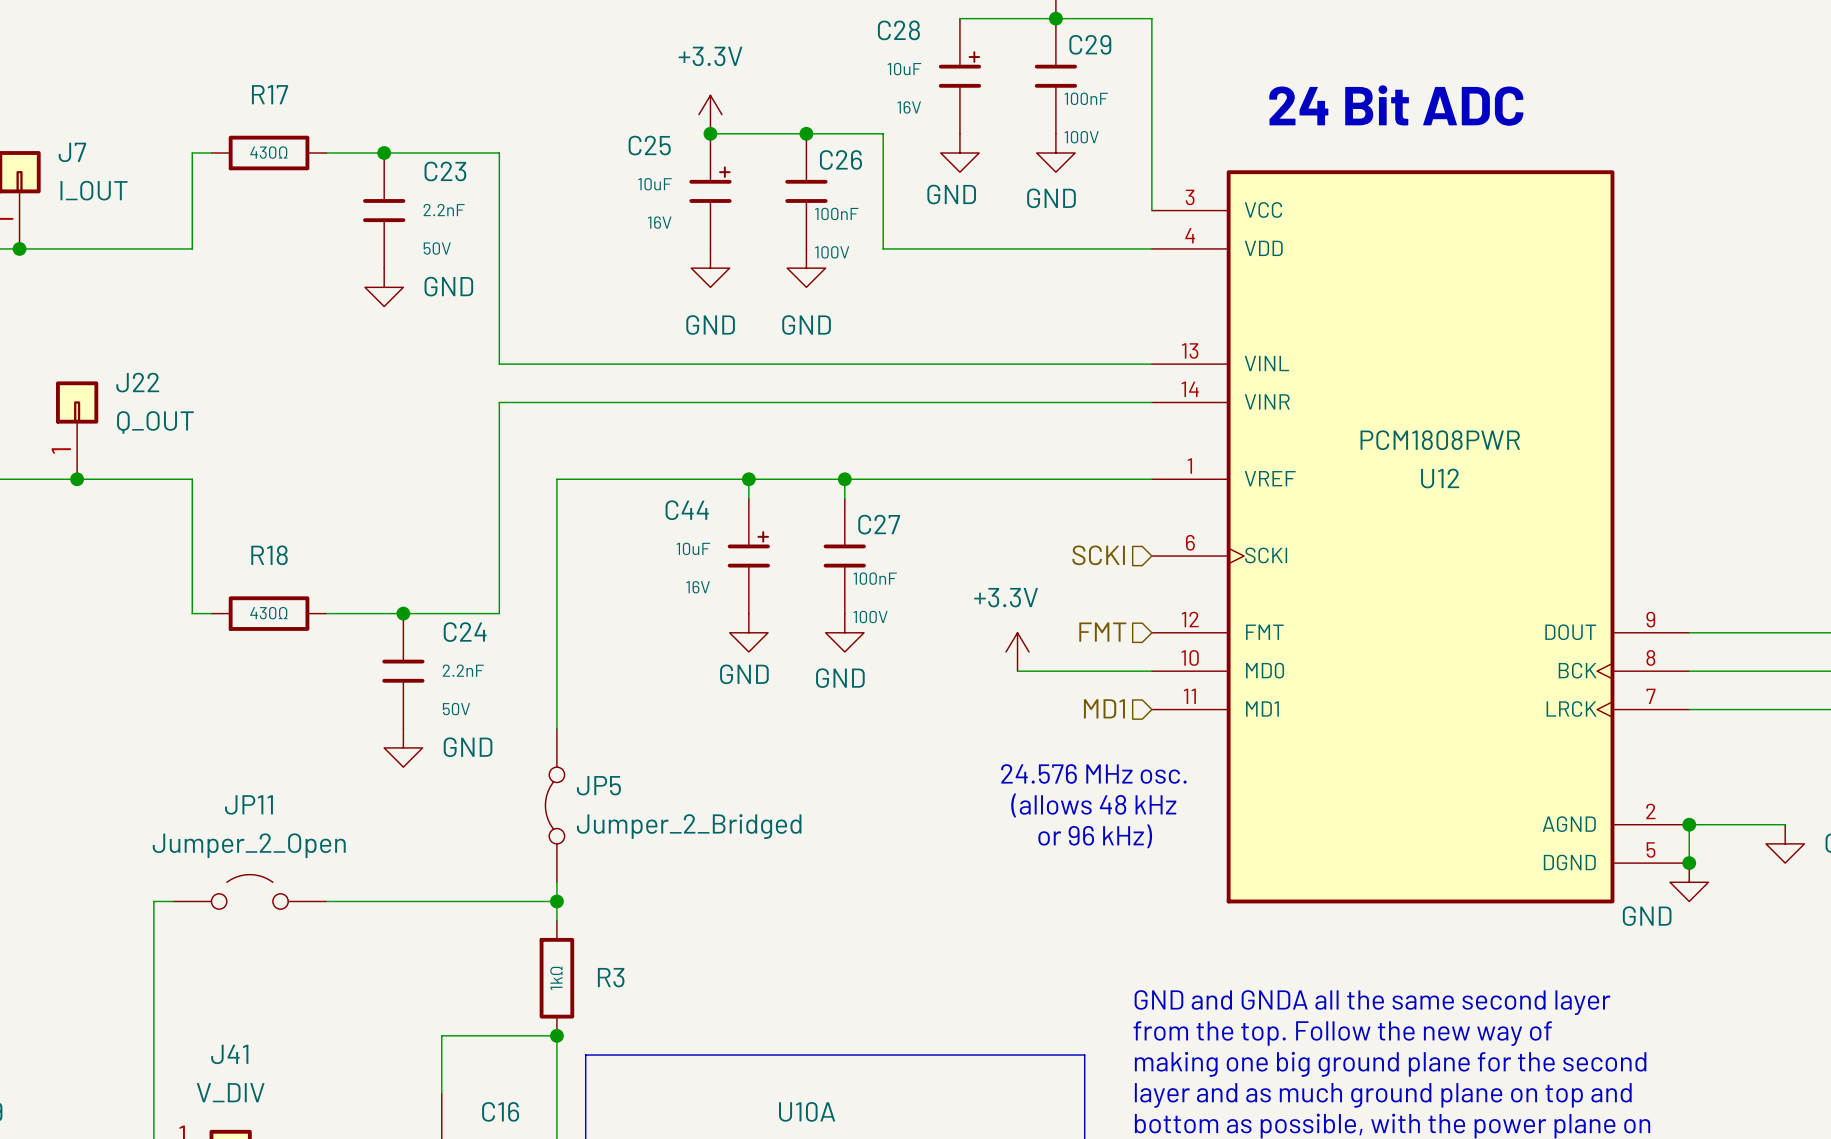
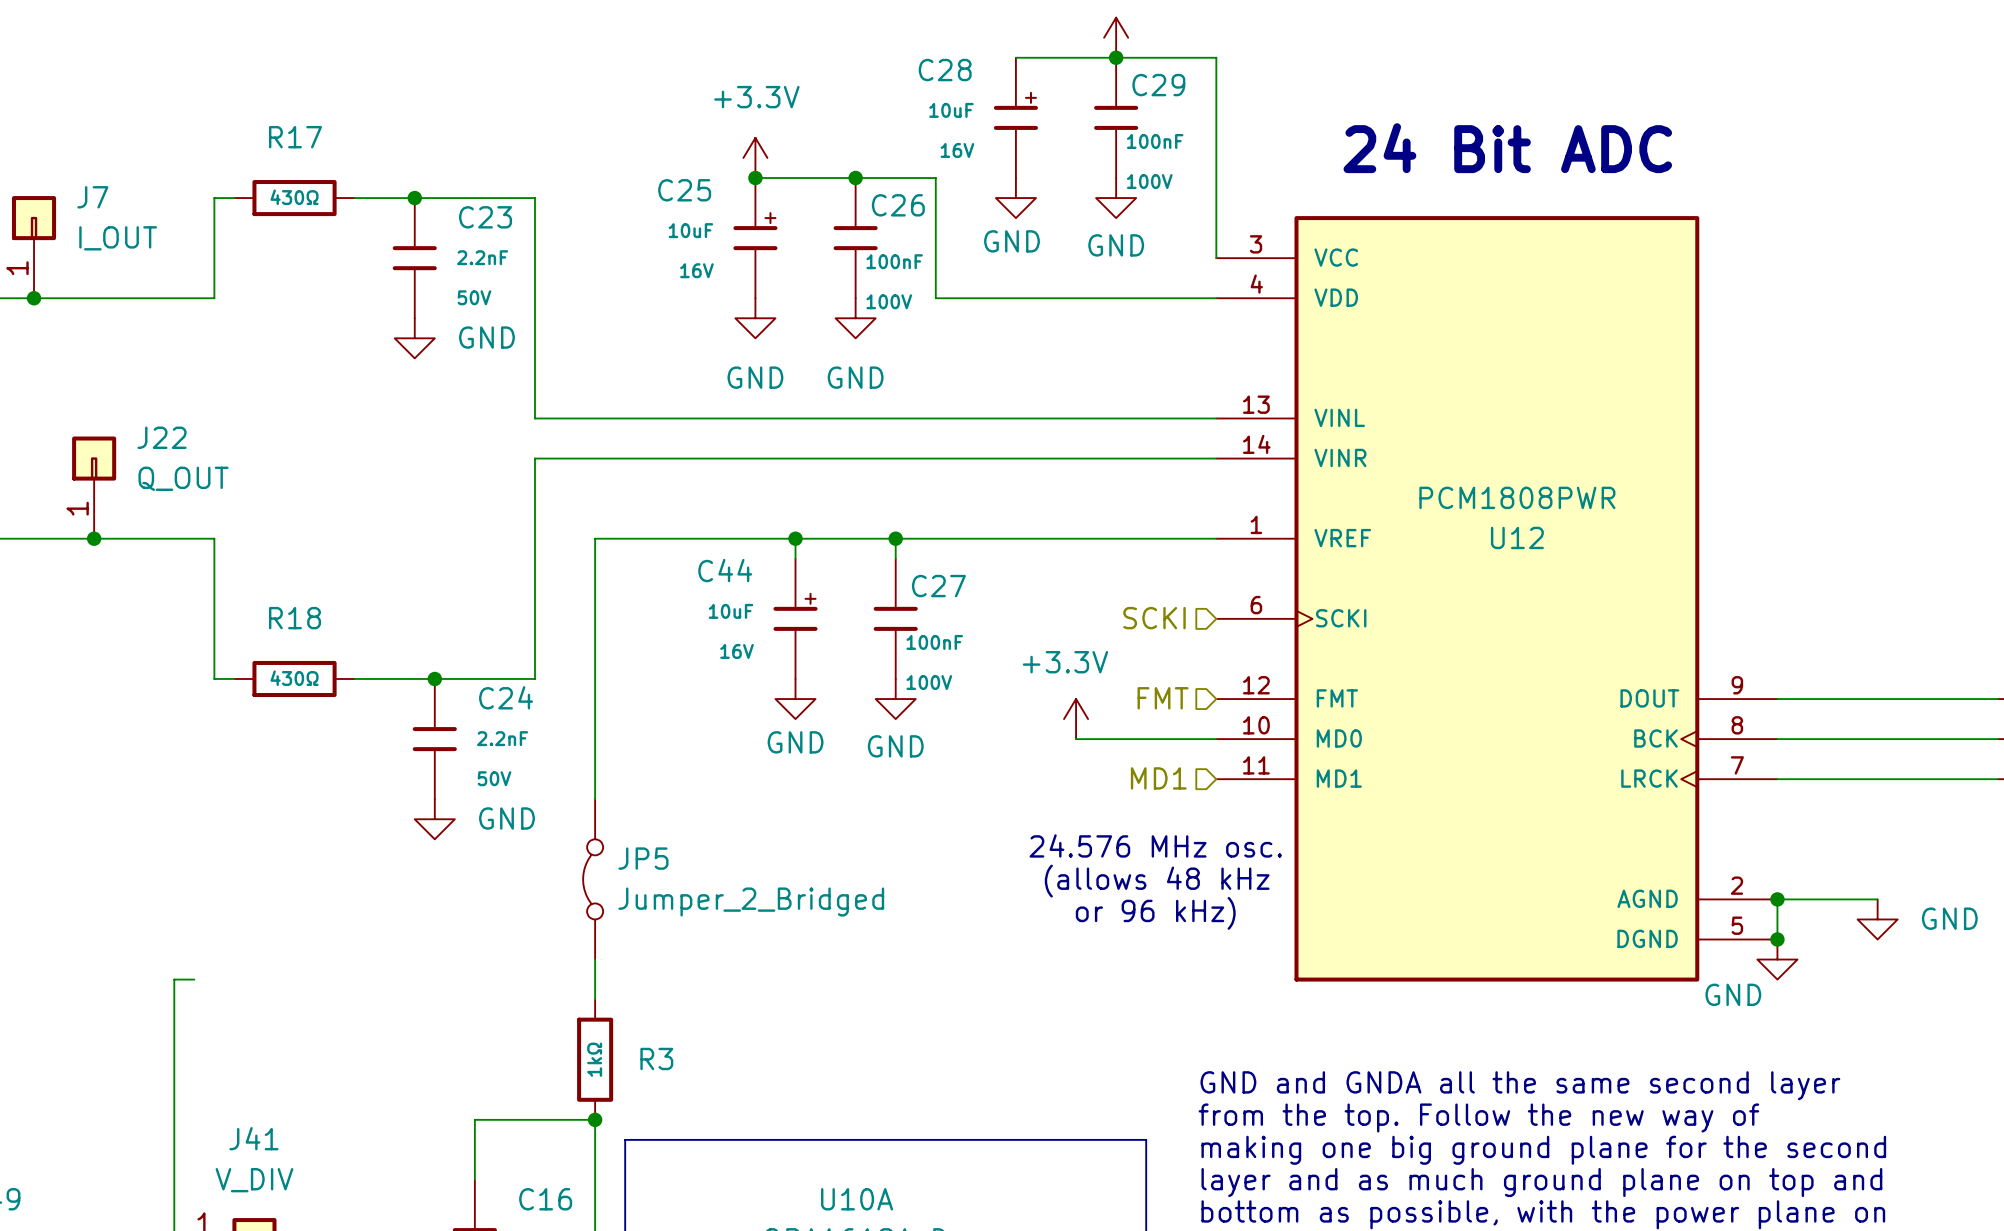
JP11: Jumper_2_Open (249, 891) -> none
wire: (326, 901) (556, 901) -> none
junction: (556, 901) -> none

